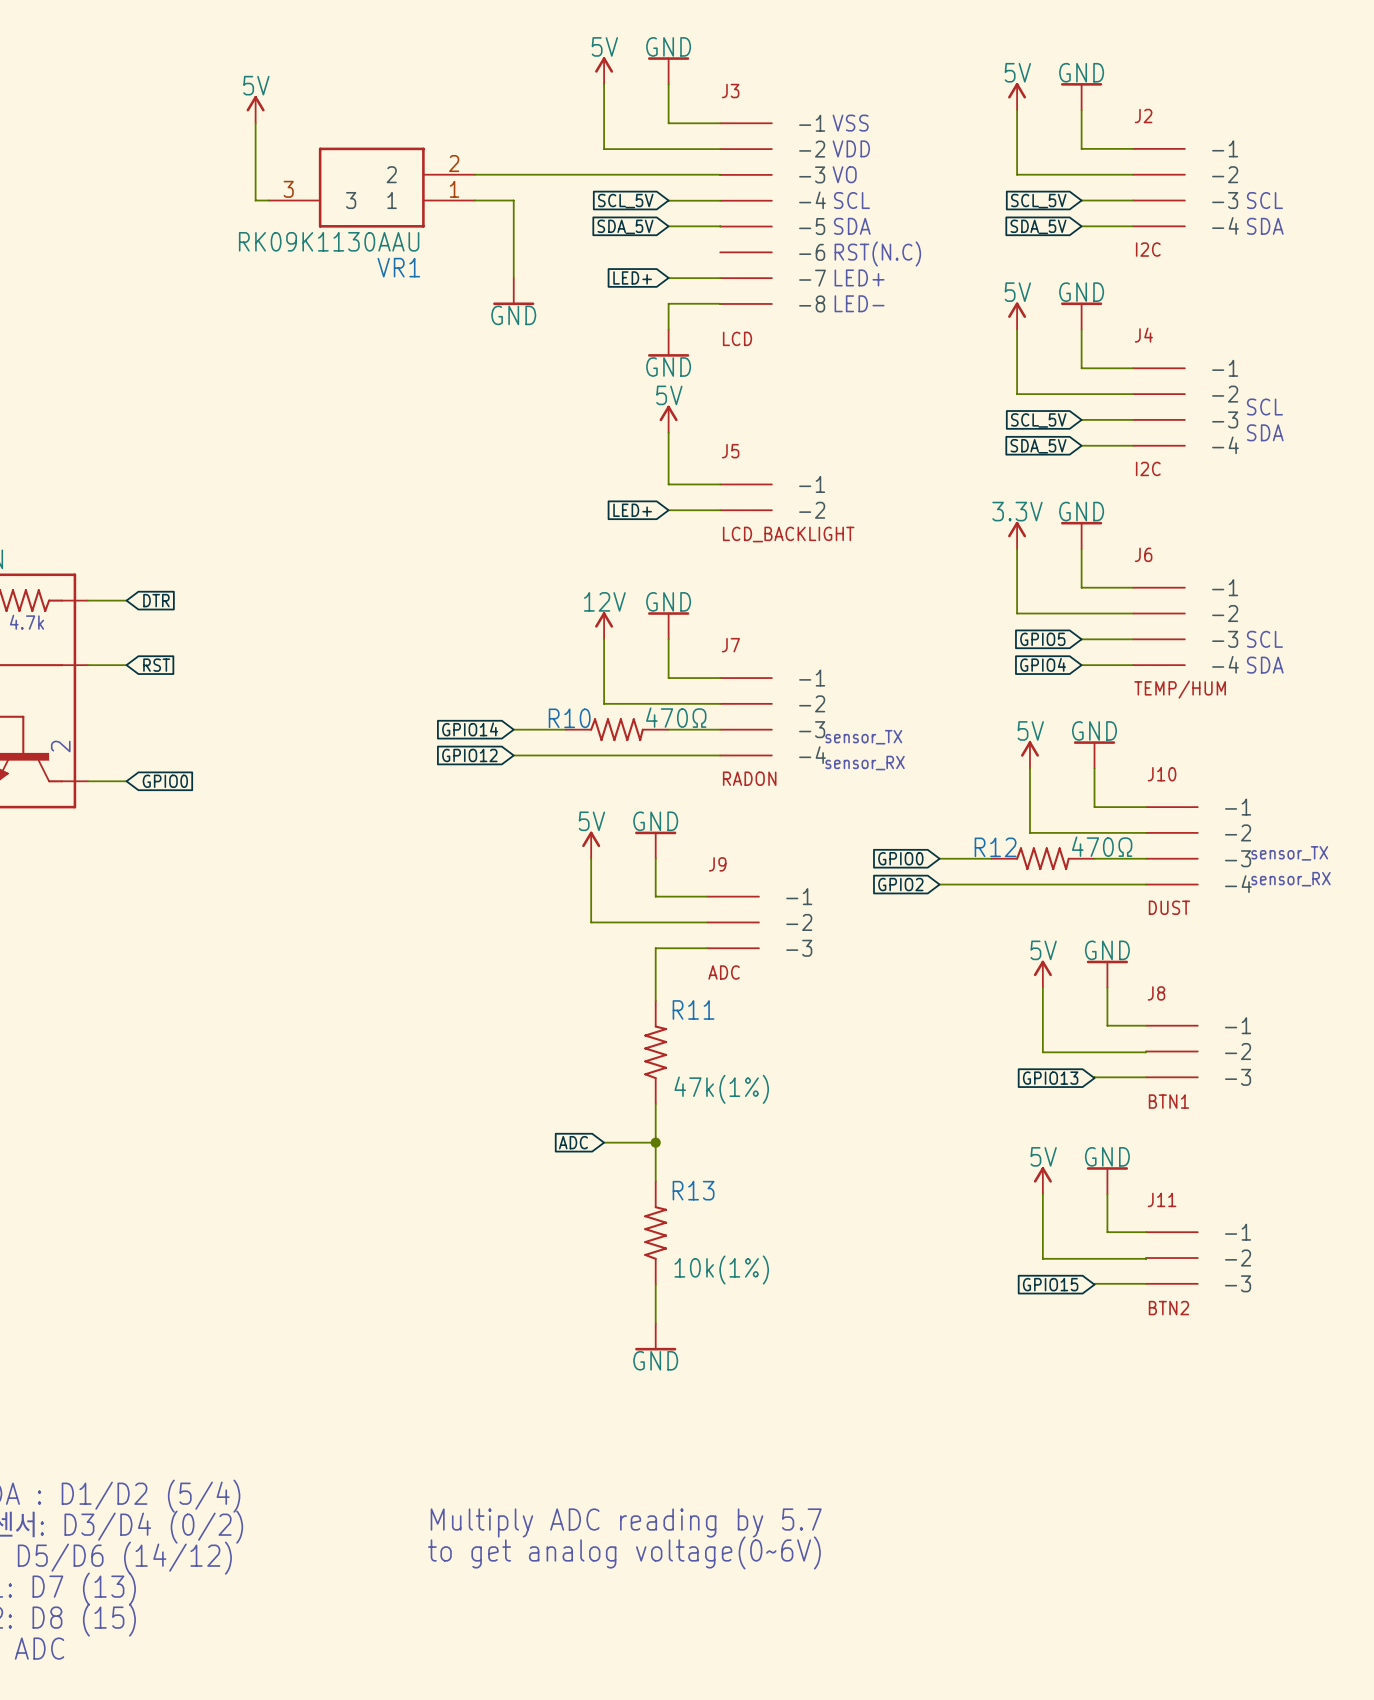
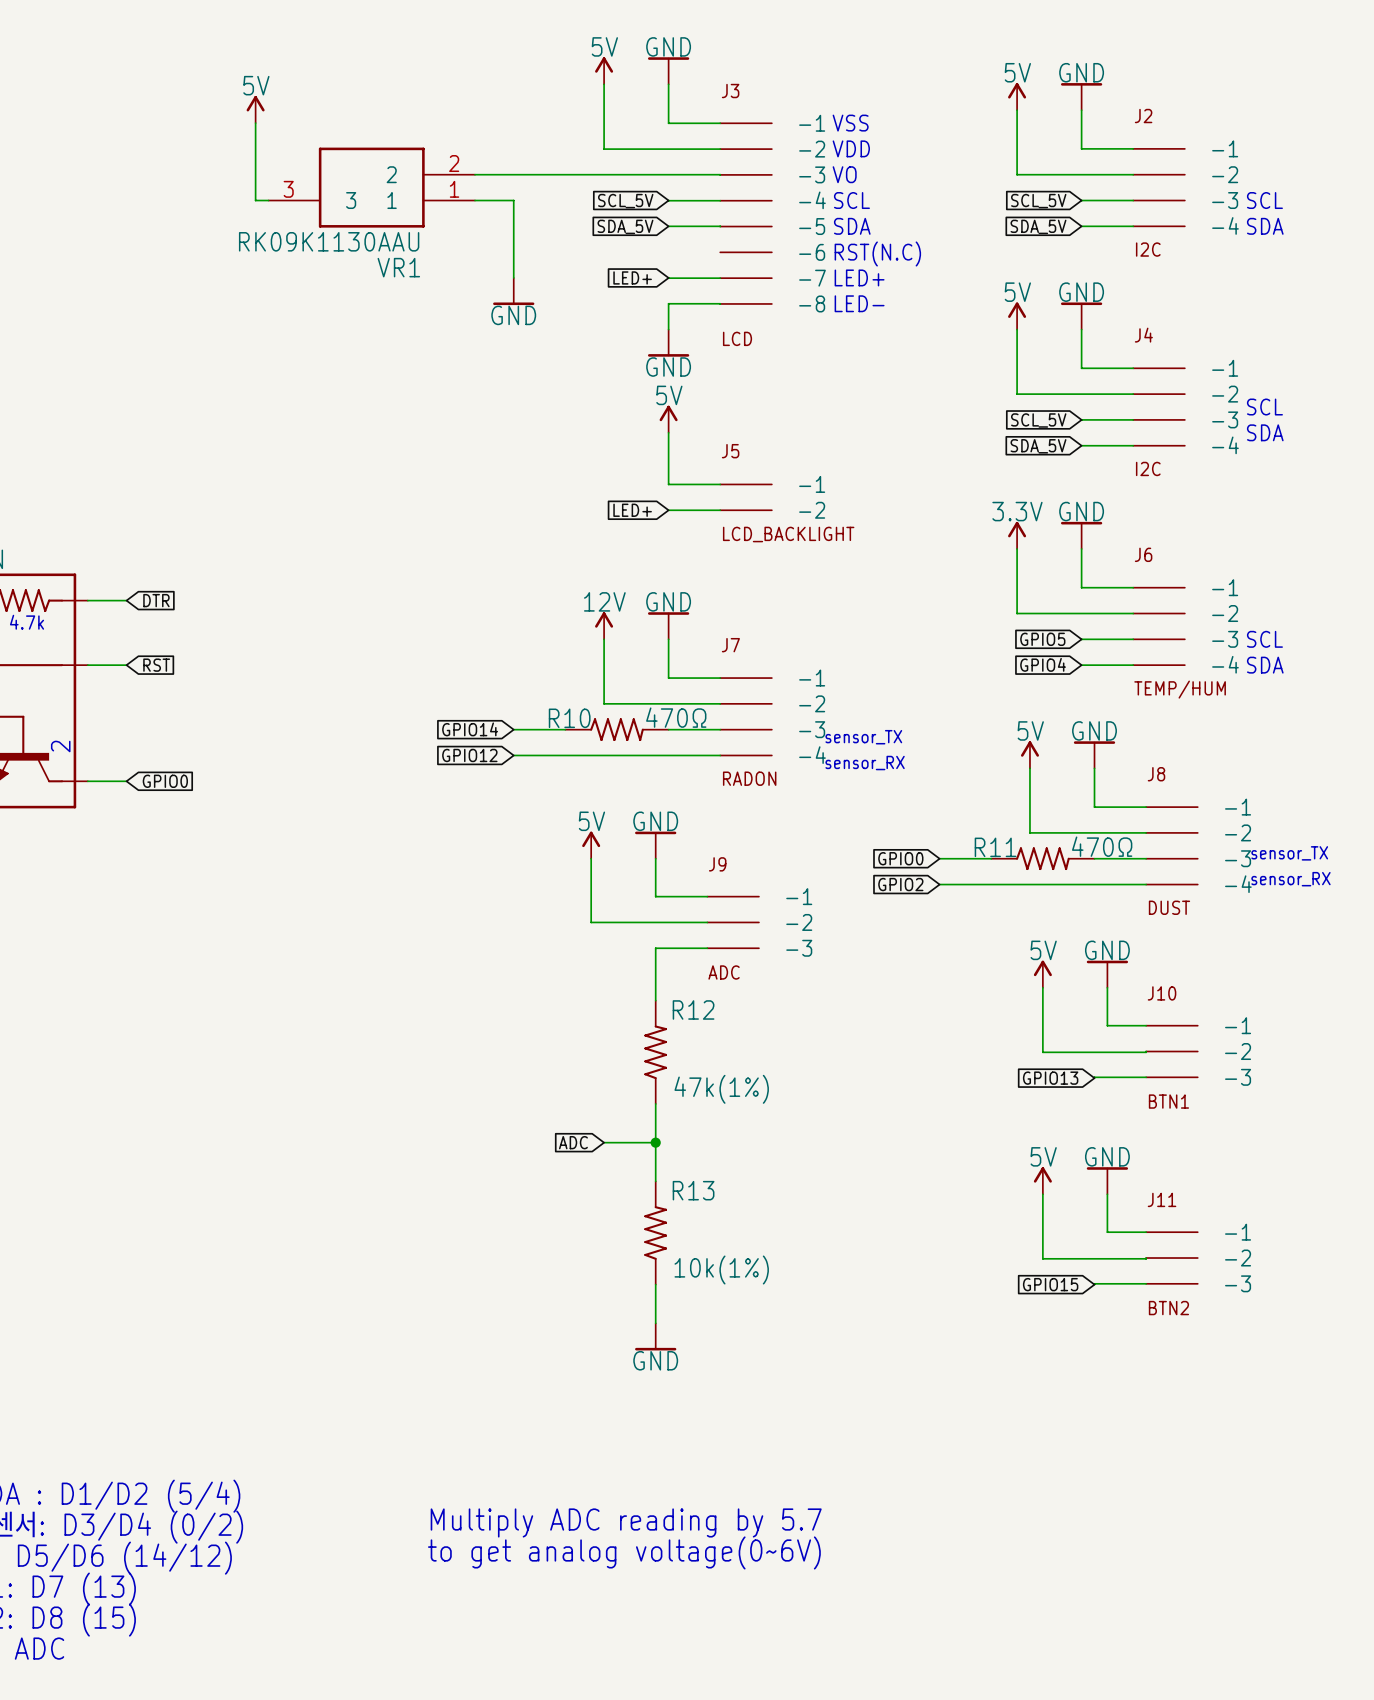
J10 name: J10 (1162, 774) -> J8 (1156, 774)
R12 name: R12 (995, 847) -> R11 (995, 847)
J8 name: J8 (1156, 993) -> J10 (1162, 993)
R11 name: R11 (693, 1009) -> R12 (693, 1009)

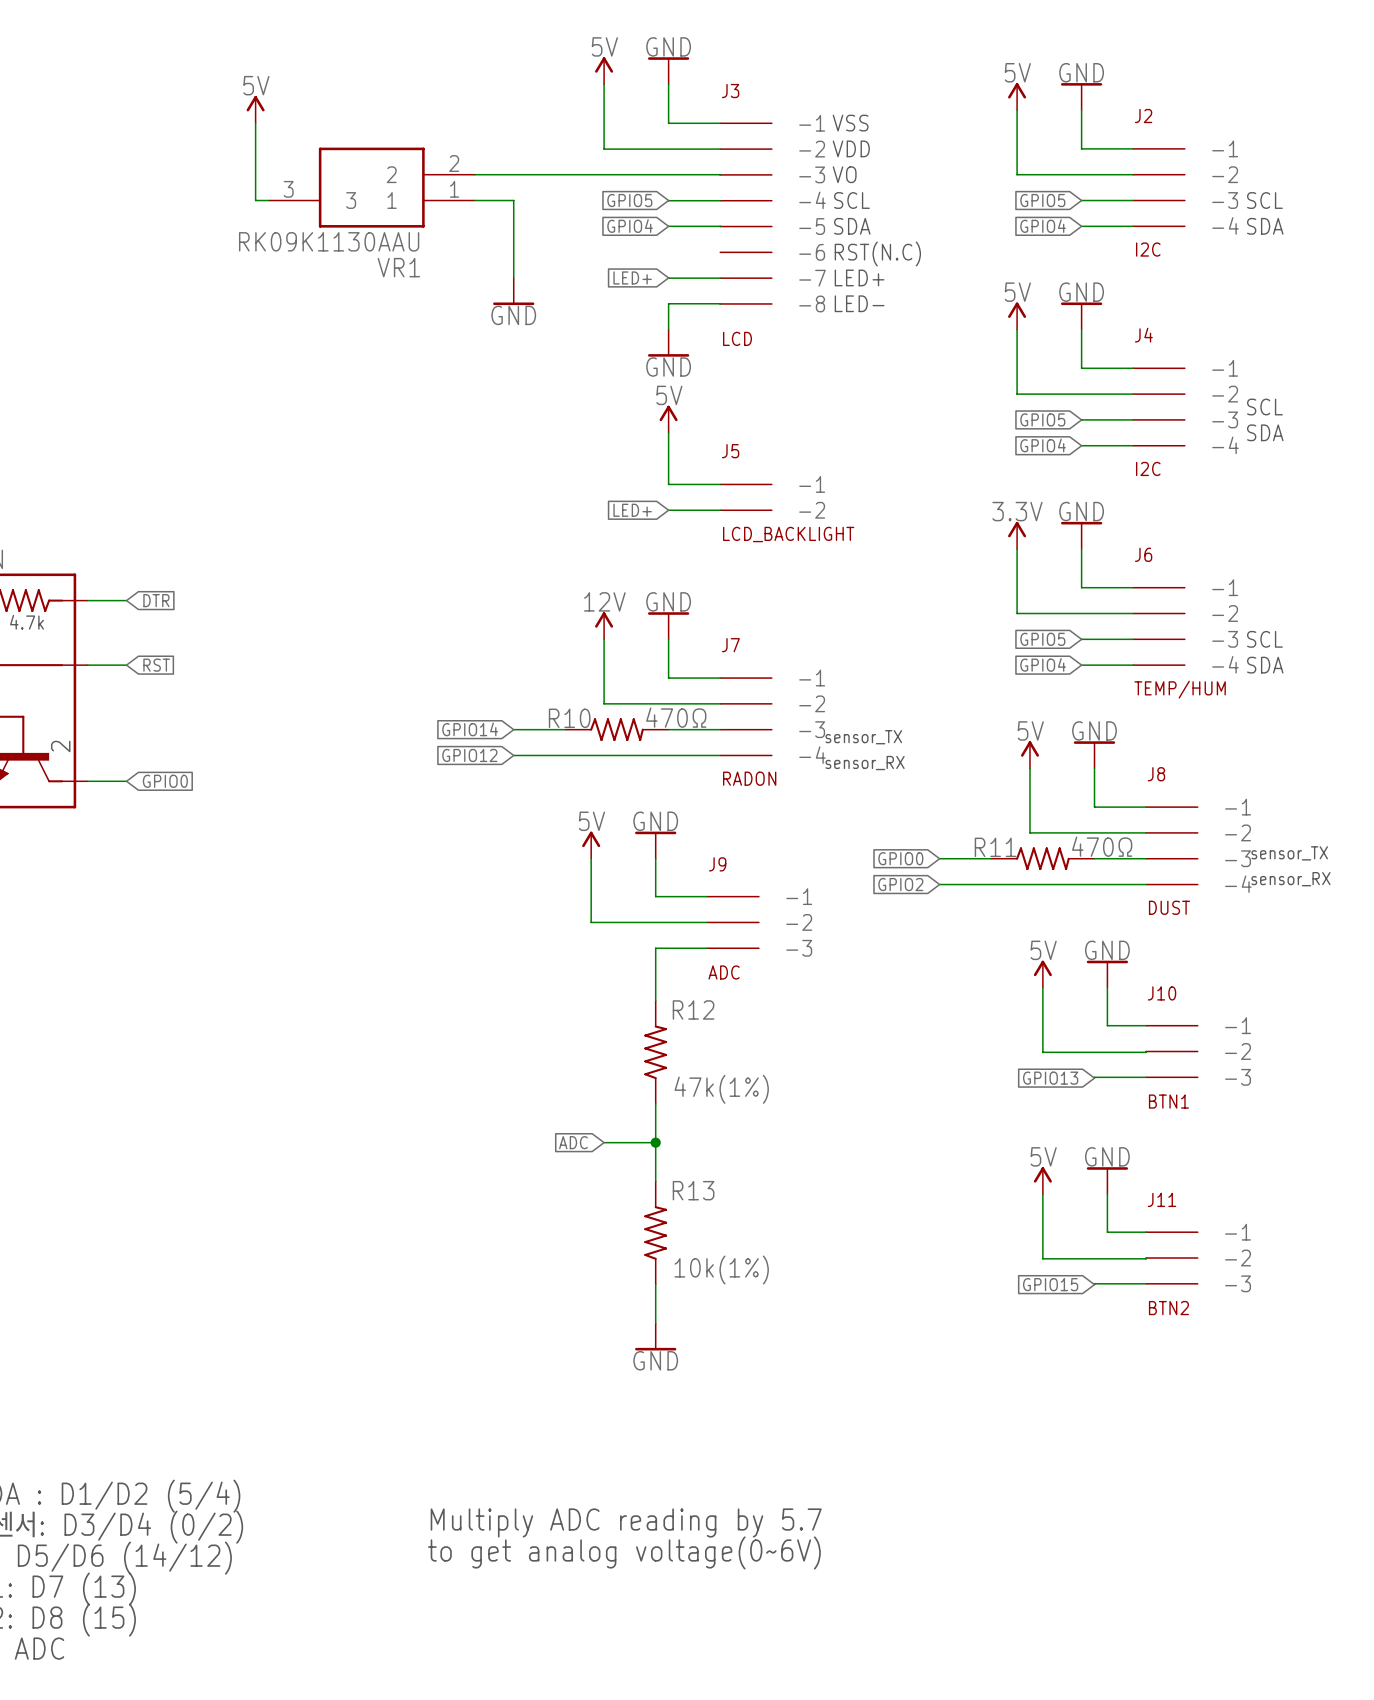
global label: SCL_5V (625, 201) -> GPIO5 (629, 200)
global label: SCL_5V (1038, 201) -> GPIO5 (1042, 200)
global label: SDA_5V (625, 226) -> GPIO4 (630, 226)
global label: SDA_5V (1038, 226) -> GPIO4 (1043, 226)
global label: SCL_5V (1038, 420) -> GPIO5 (1042, 419)
global label: SDA_5V (1038, 446) -> GPIO4 (1043, 445)

